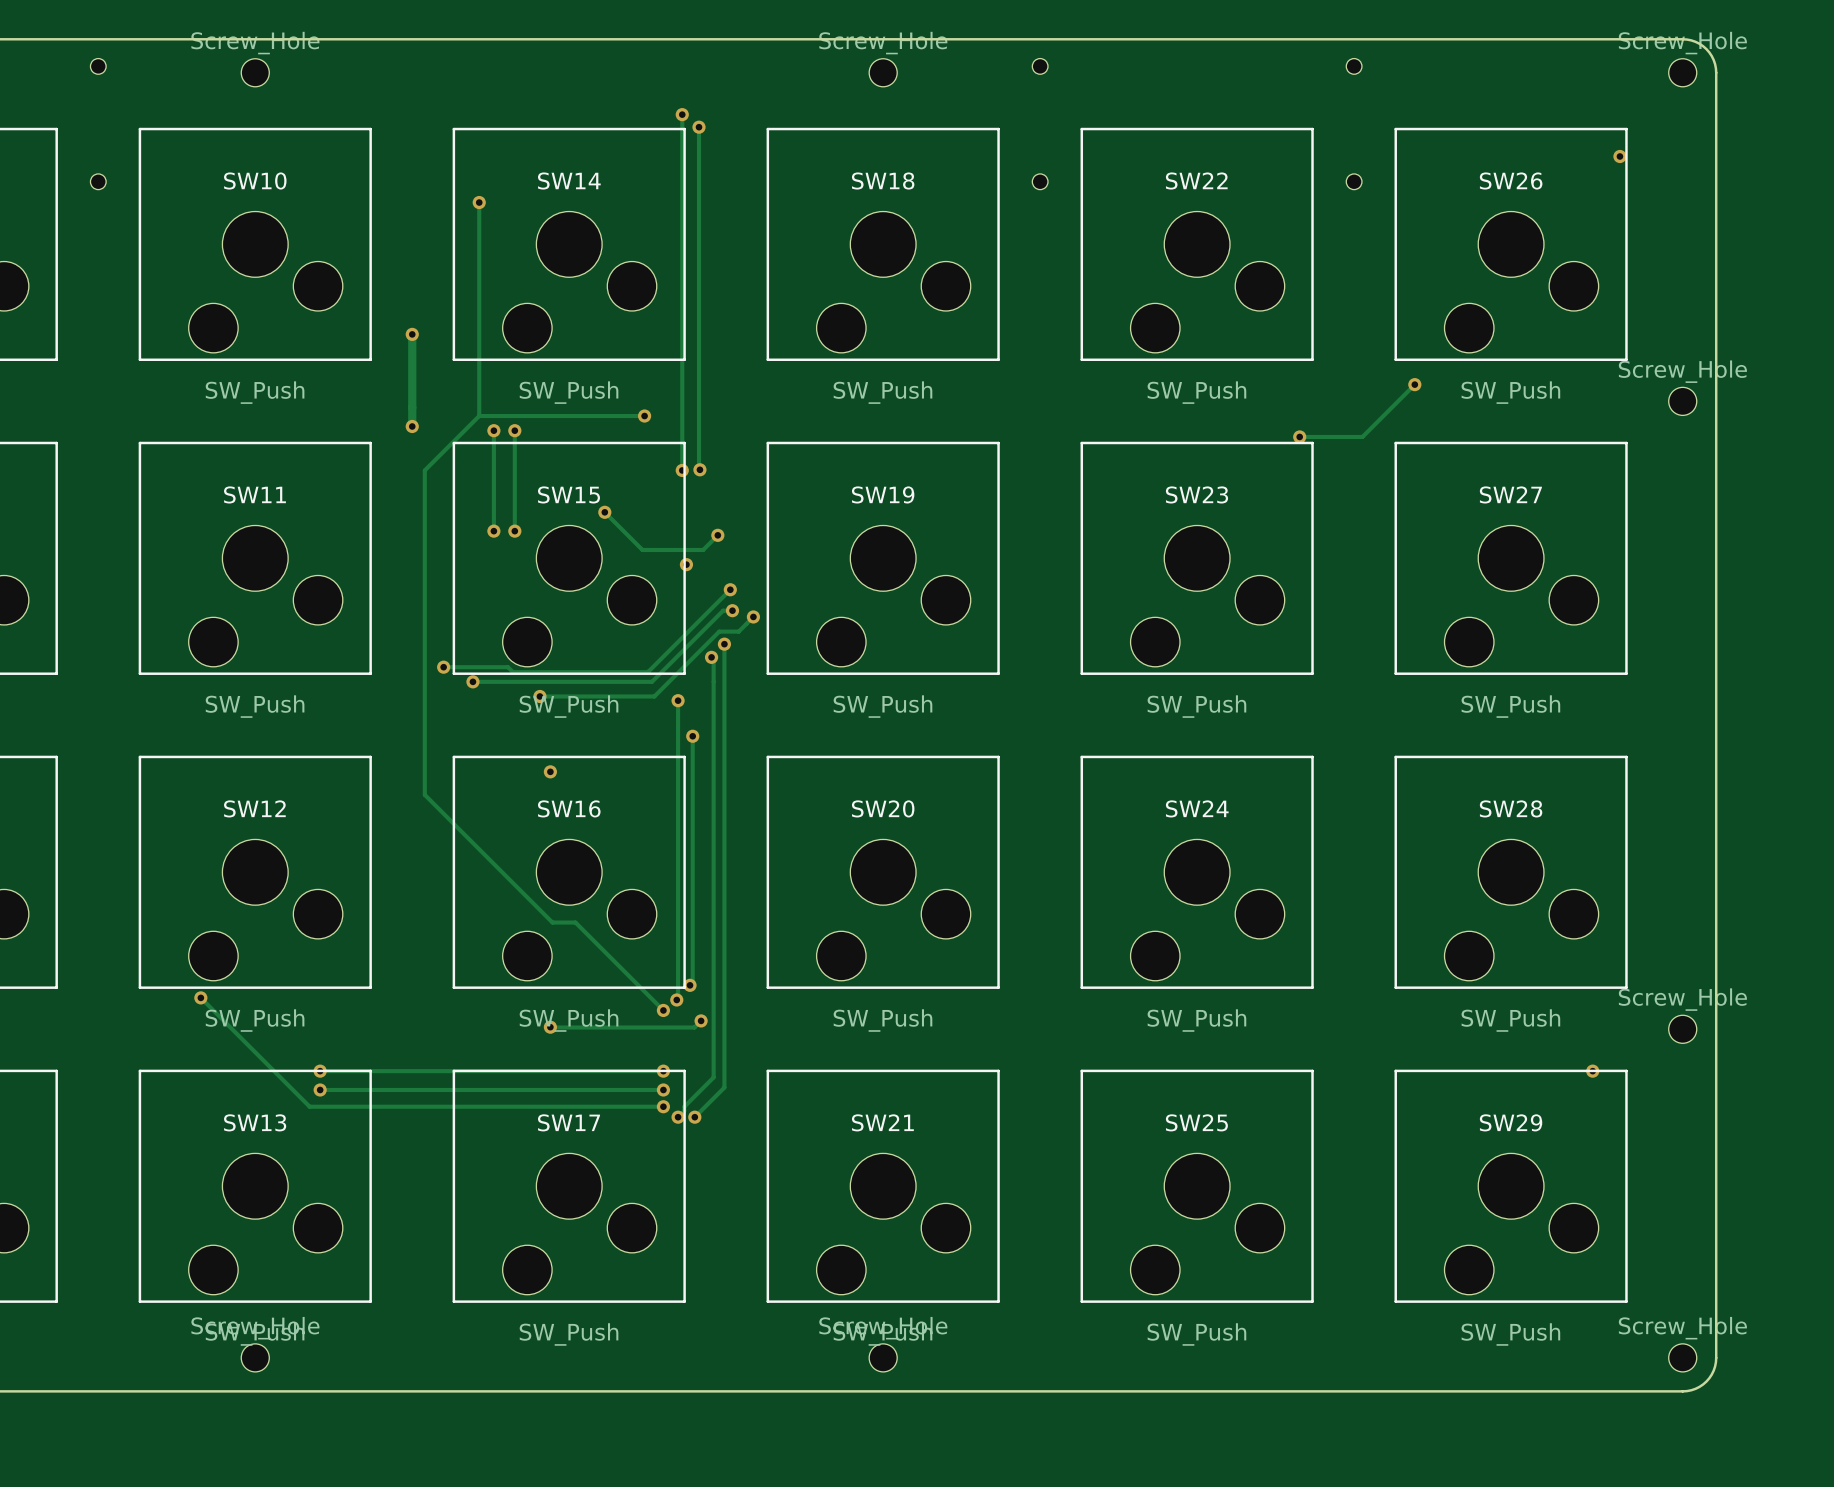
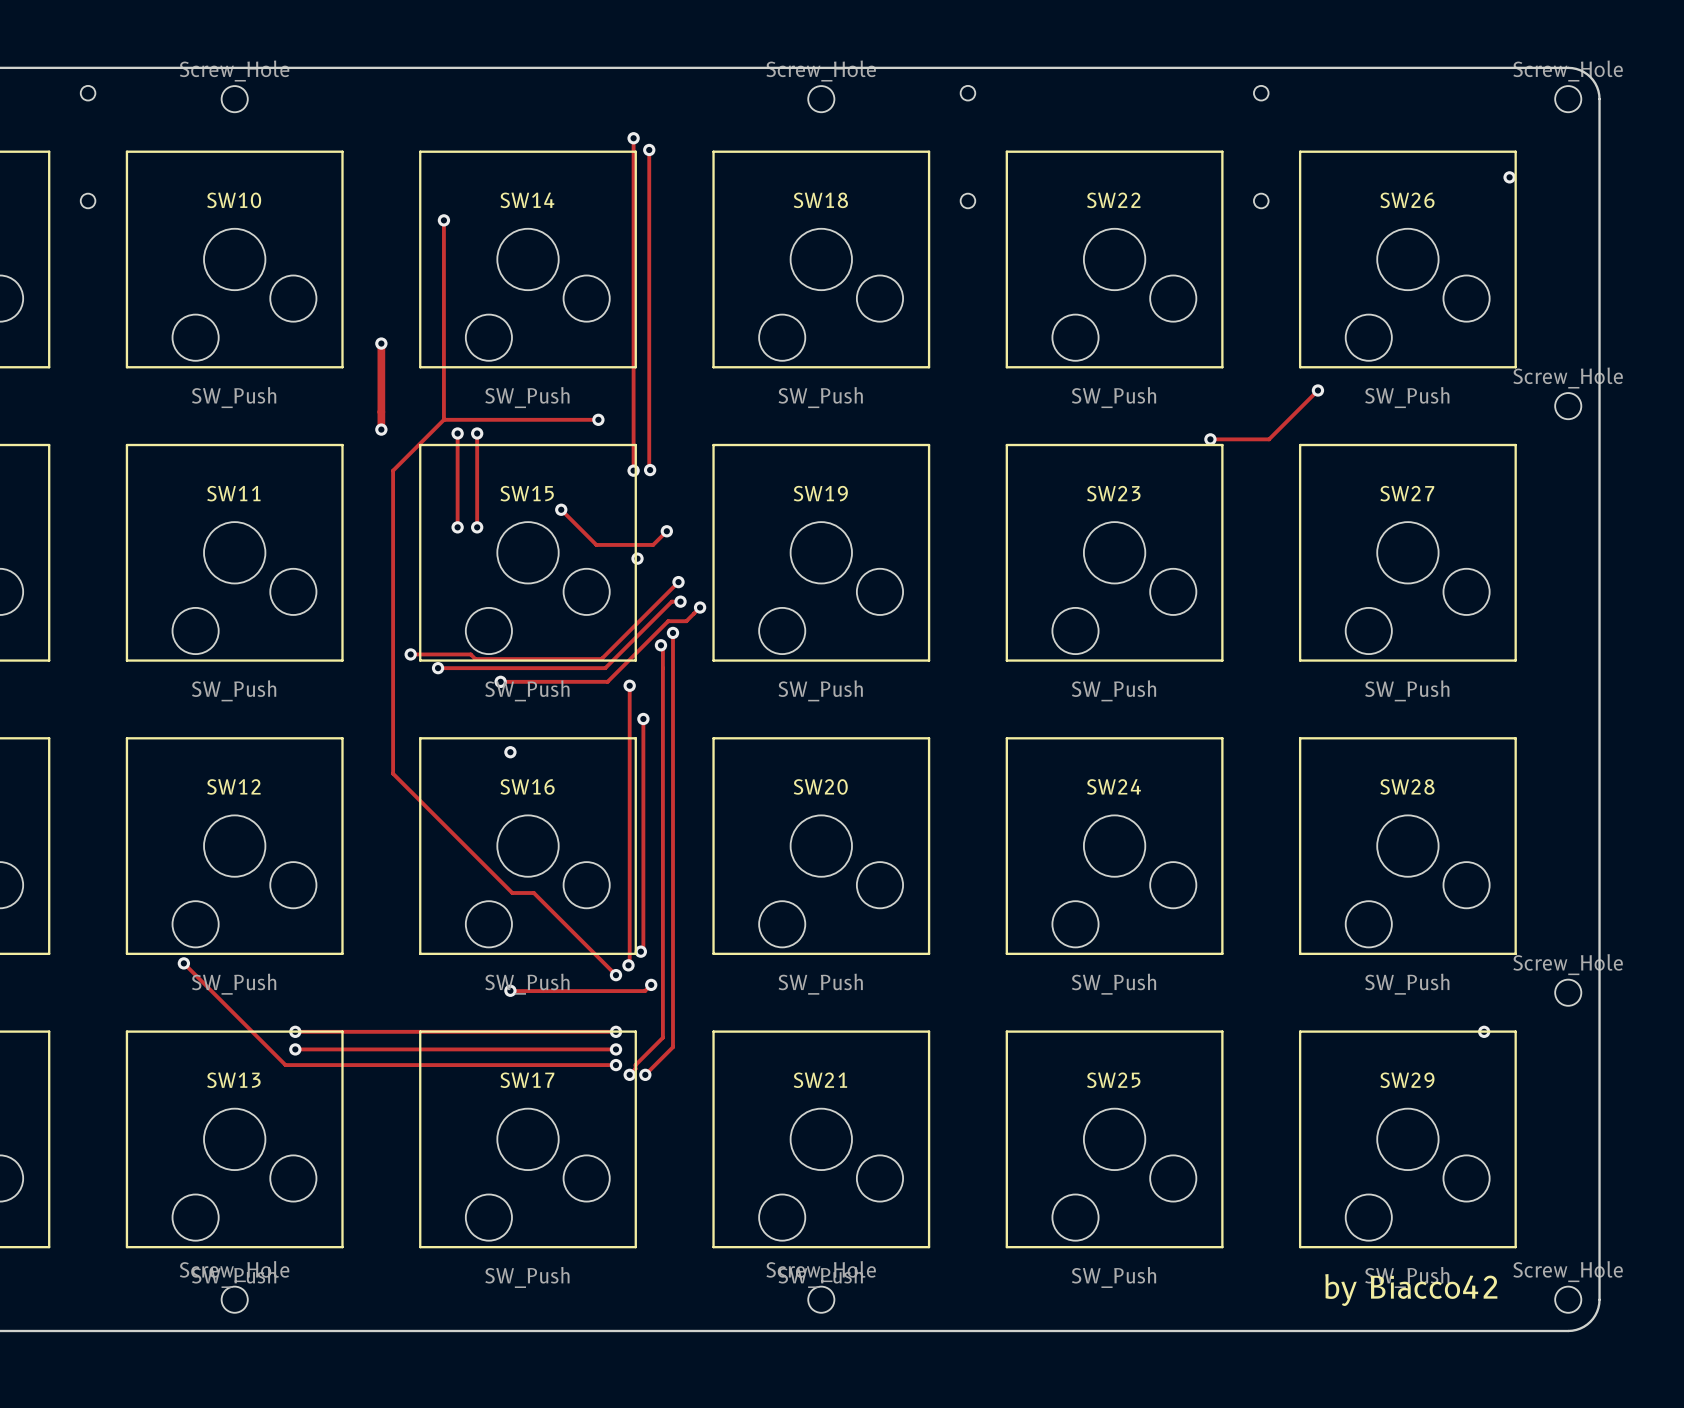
text: none -> by Biacco42 (1411, 1290)

